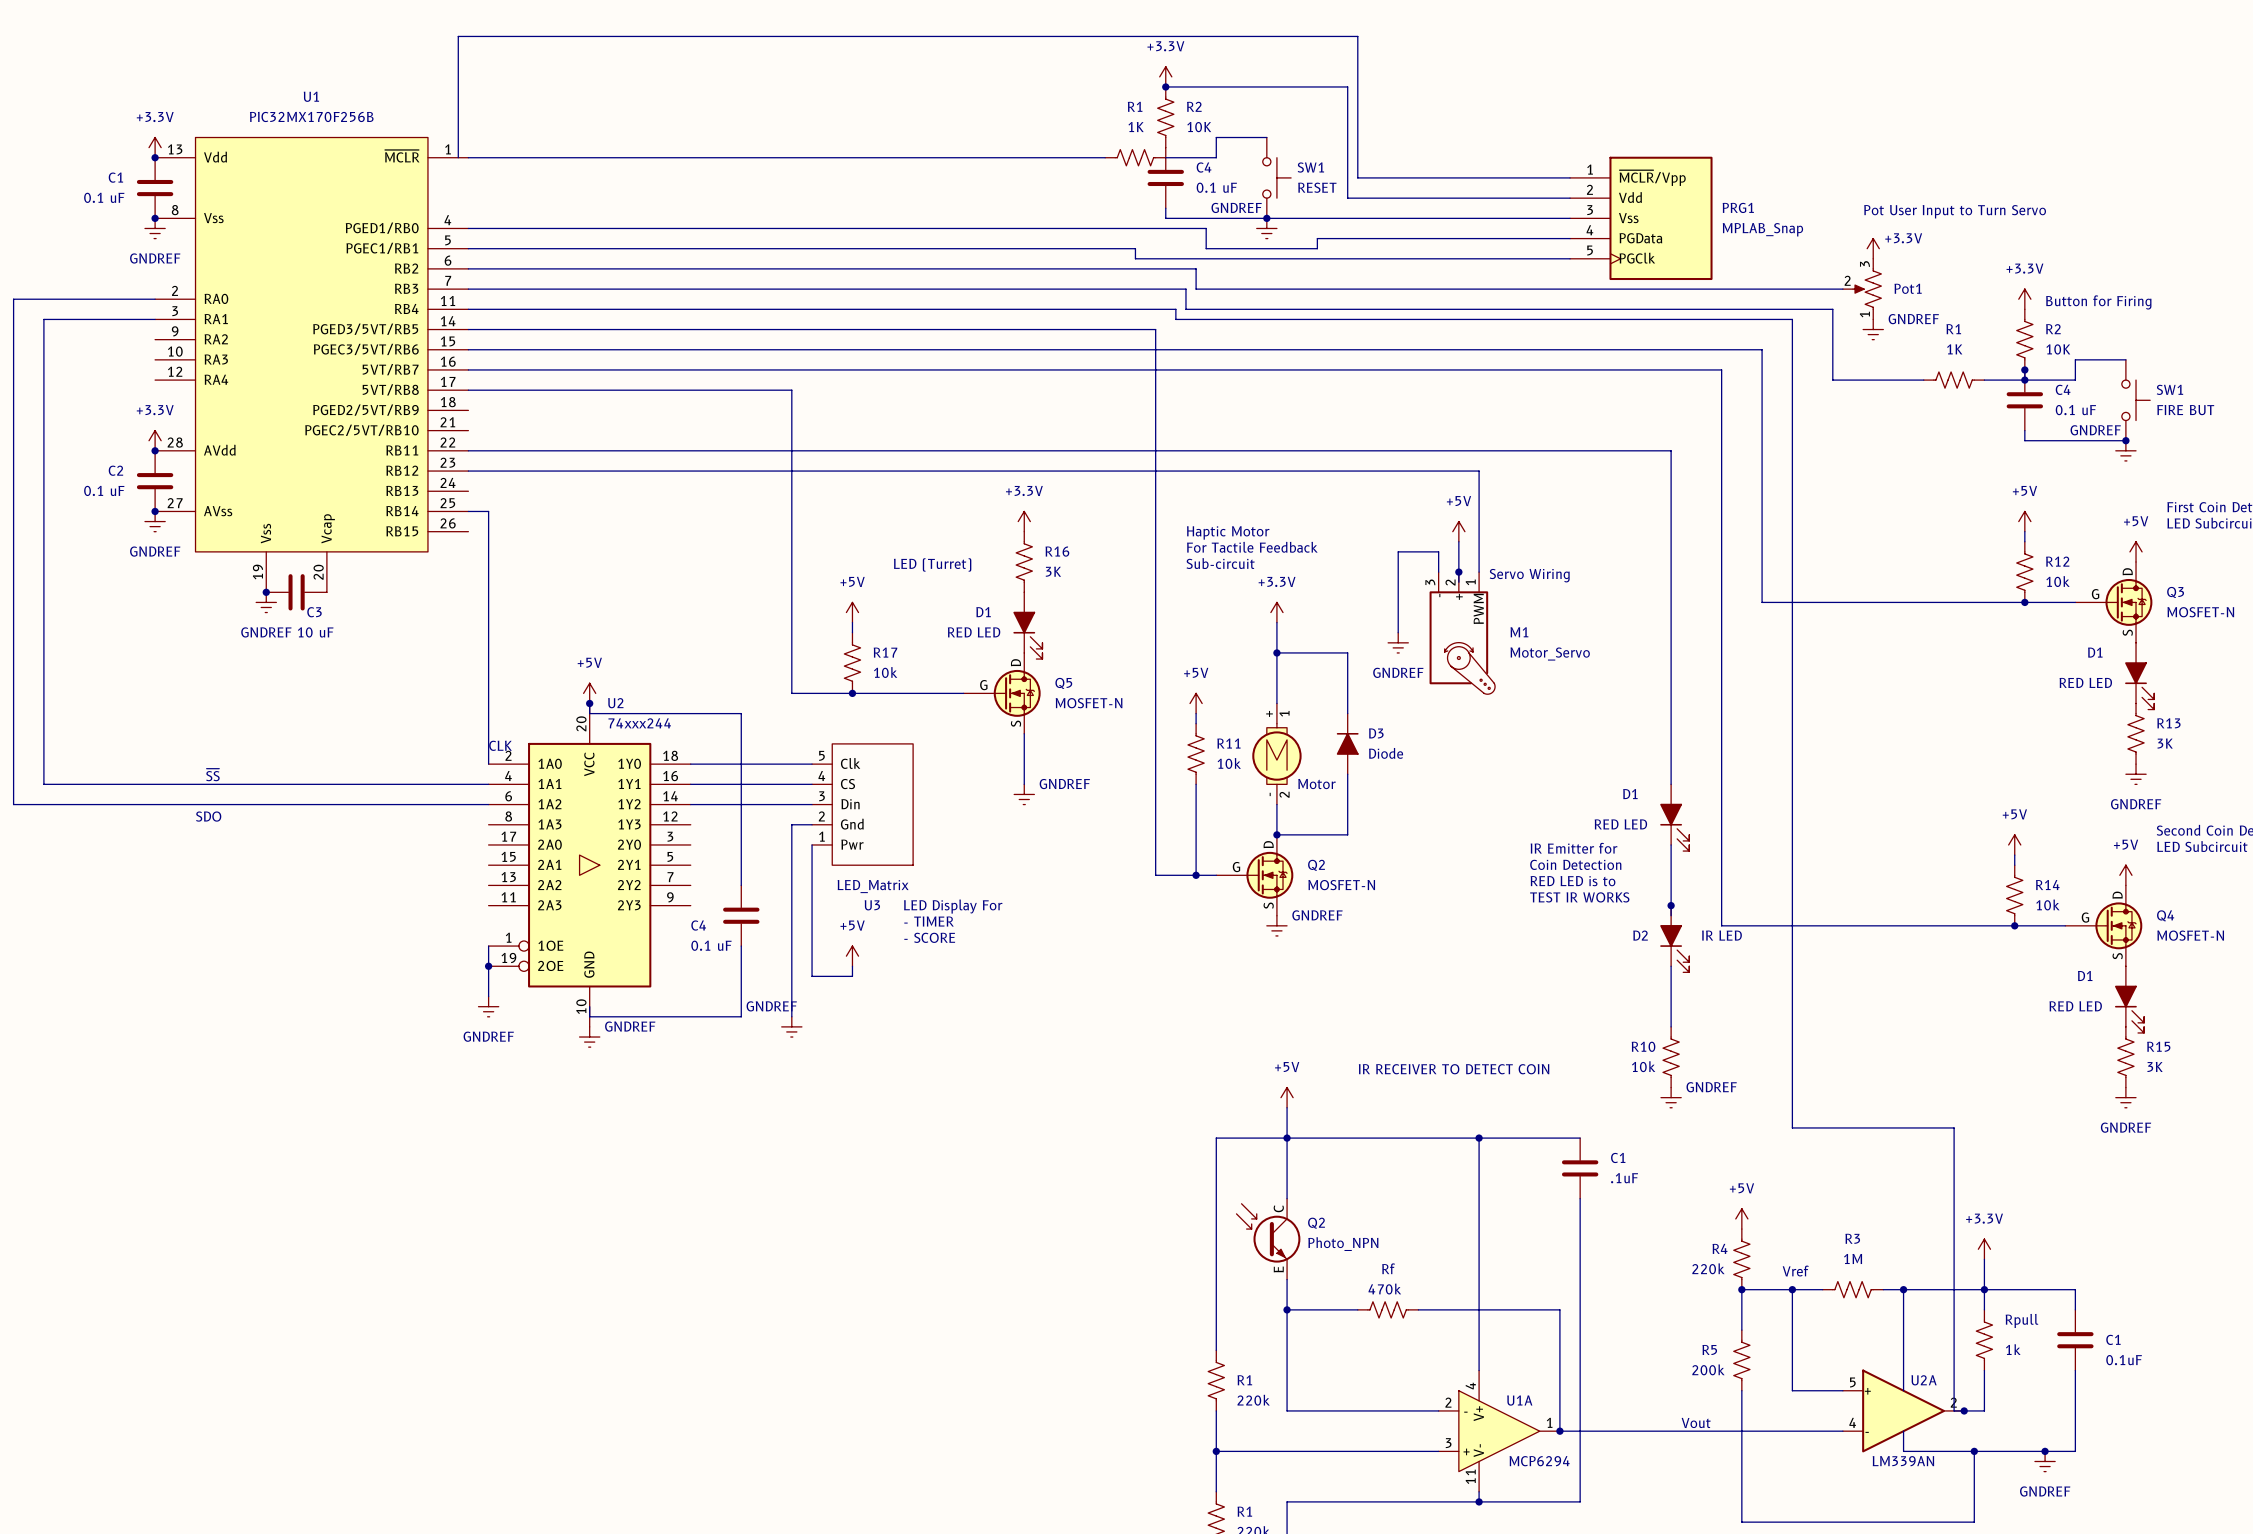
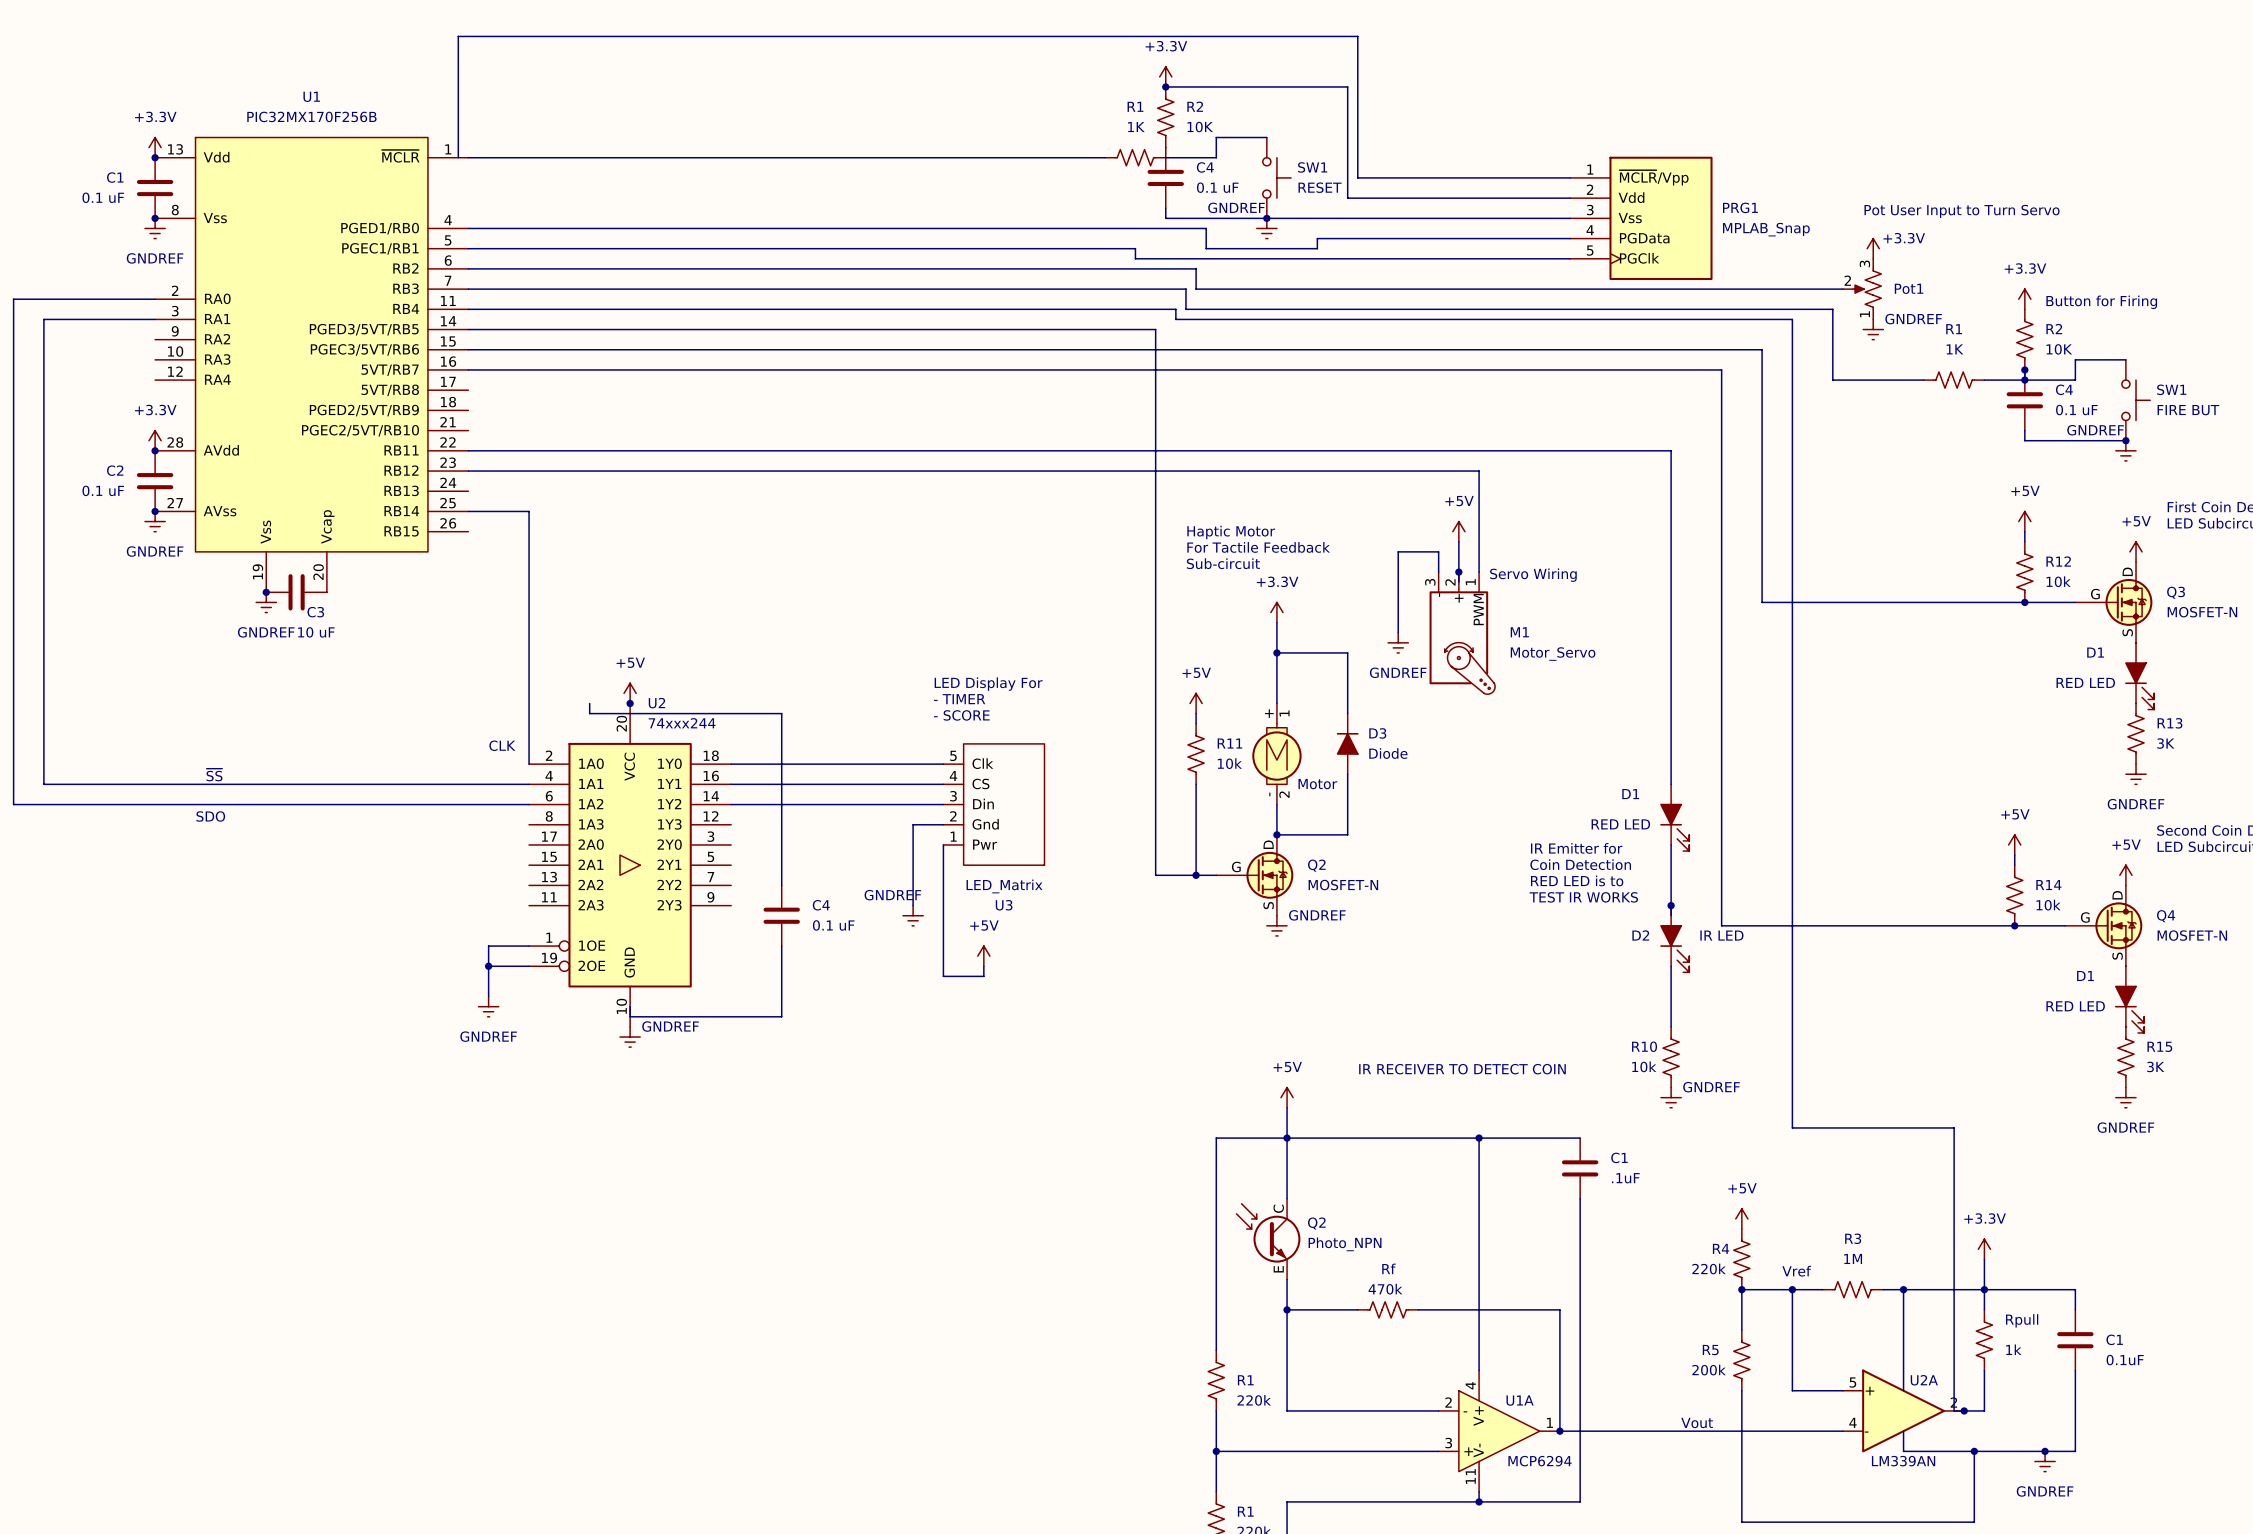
wire: (468, 390) (791, 390) (791, 693) (963, 693) -> none
wire: (488, 511) (488, 764) -> (488, 511) (529, 511) (529, 764)
power symbol: +3.3V (1024, 521) -> none
R16: 3K (1024, 561) -> none
text: LED (Turret) (932, 564) -> none
power symbol: +5V (852, 612) -> none
wire: (852, 622) (852, 632) -> none
D1: RED LED (1027, 625) -> none
R17: 10k (852, 663) -> none
text: none -> LED Display For (988, 684)
power symbol position: +5V (589, 693) -> +5V (630, 693)
junction: (852, 693) -> none
Q5: MOSFET-N (1002, 693) -> none
text: none -> - TIMER (959, 699)
junction position: (589, 703) -> (630, 703)
wire: (741, 713) (741, 885) -> (741, 713) (781, 713) (781, 885)
text: none -> - SCORE (961, 715)
wire: (1024, 733) (1024, 784) -> none
wire: none -> (812, 764) (943, 764)
wire: none -> (812, 784) (943, 784)
power symbol: GNDREF (1024, 794) -> none
wire: none -> (812, 804) (943, 804)
U3 position: (862, 804) -> (993, 804)
wire: (812, 824) (791, 824) (791, 1016) -> none
wire: none -> (943, 824) (913, 824) (913, 905)
wire: (812, 844) (812, 976) (852, 976) (852, 966) -> (943, 844) (943, 976) (983, 976) (983, 966)
U2 position: (589, 865) -> (630, 865)
text: LED Display For (953, 906) -> none
C4 position: (741, 915) -> (781, 915)
power symbol: none -> GNDREF (913, 915)
text: - TIMER (929, 921) -> none
C4 name position: C4 (698, 925) -> C4 (821, 905)
text: - SCORE (929, 937) -> none
C4 value position: 0.1 uF (711, 945) -> 0.1 uF (833, 925)
wire: (741, 946) (741, 1016) -> (781, 946) (781, 1016) (741, 1016)
power symbol position: +5V (852, 956) -> +5V (983, 956)
wire: (589, 1006) (589, 1016) (630, 1016) -> (630, 1006) (630, 1016)
power symbol: GNDREF (791, 1026) -> none
power symbol position: GNDREF (589, 1037) -> GNDREF (630, 1037)

